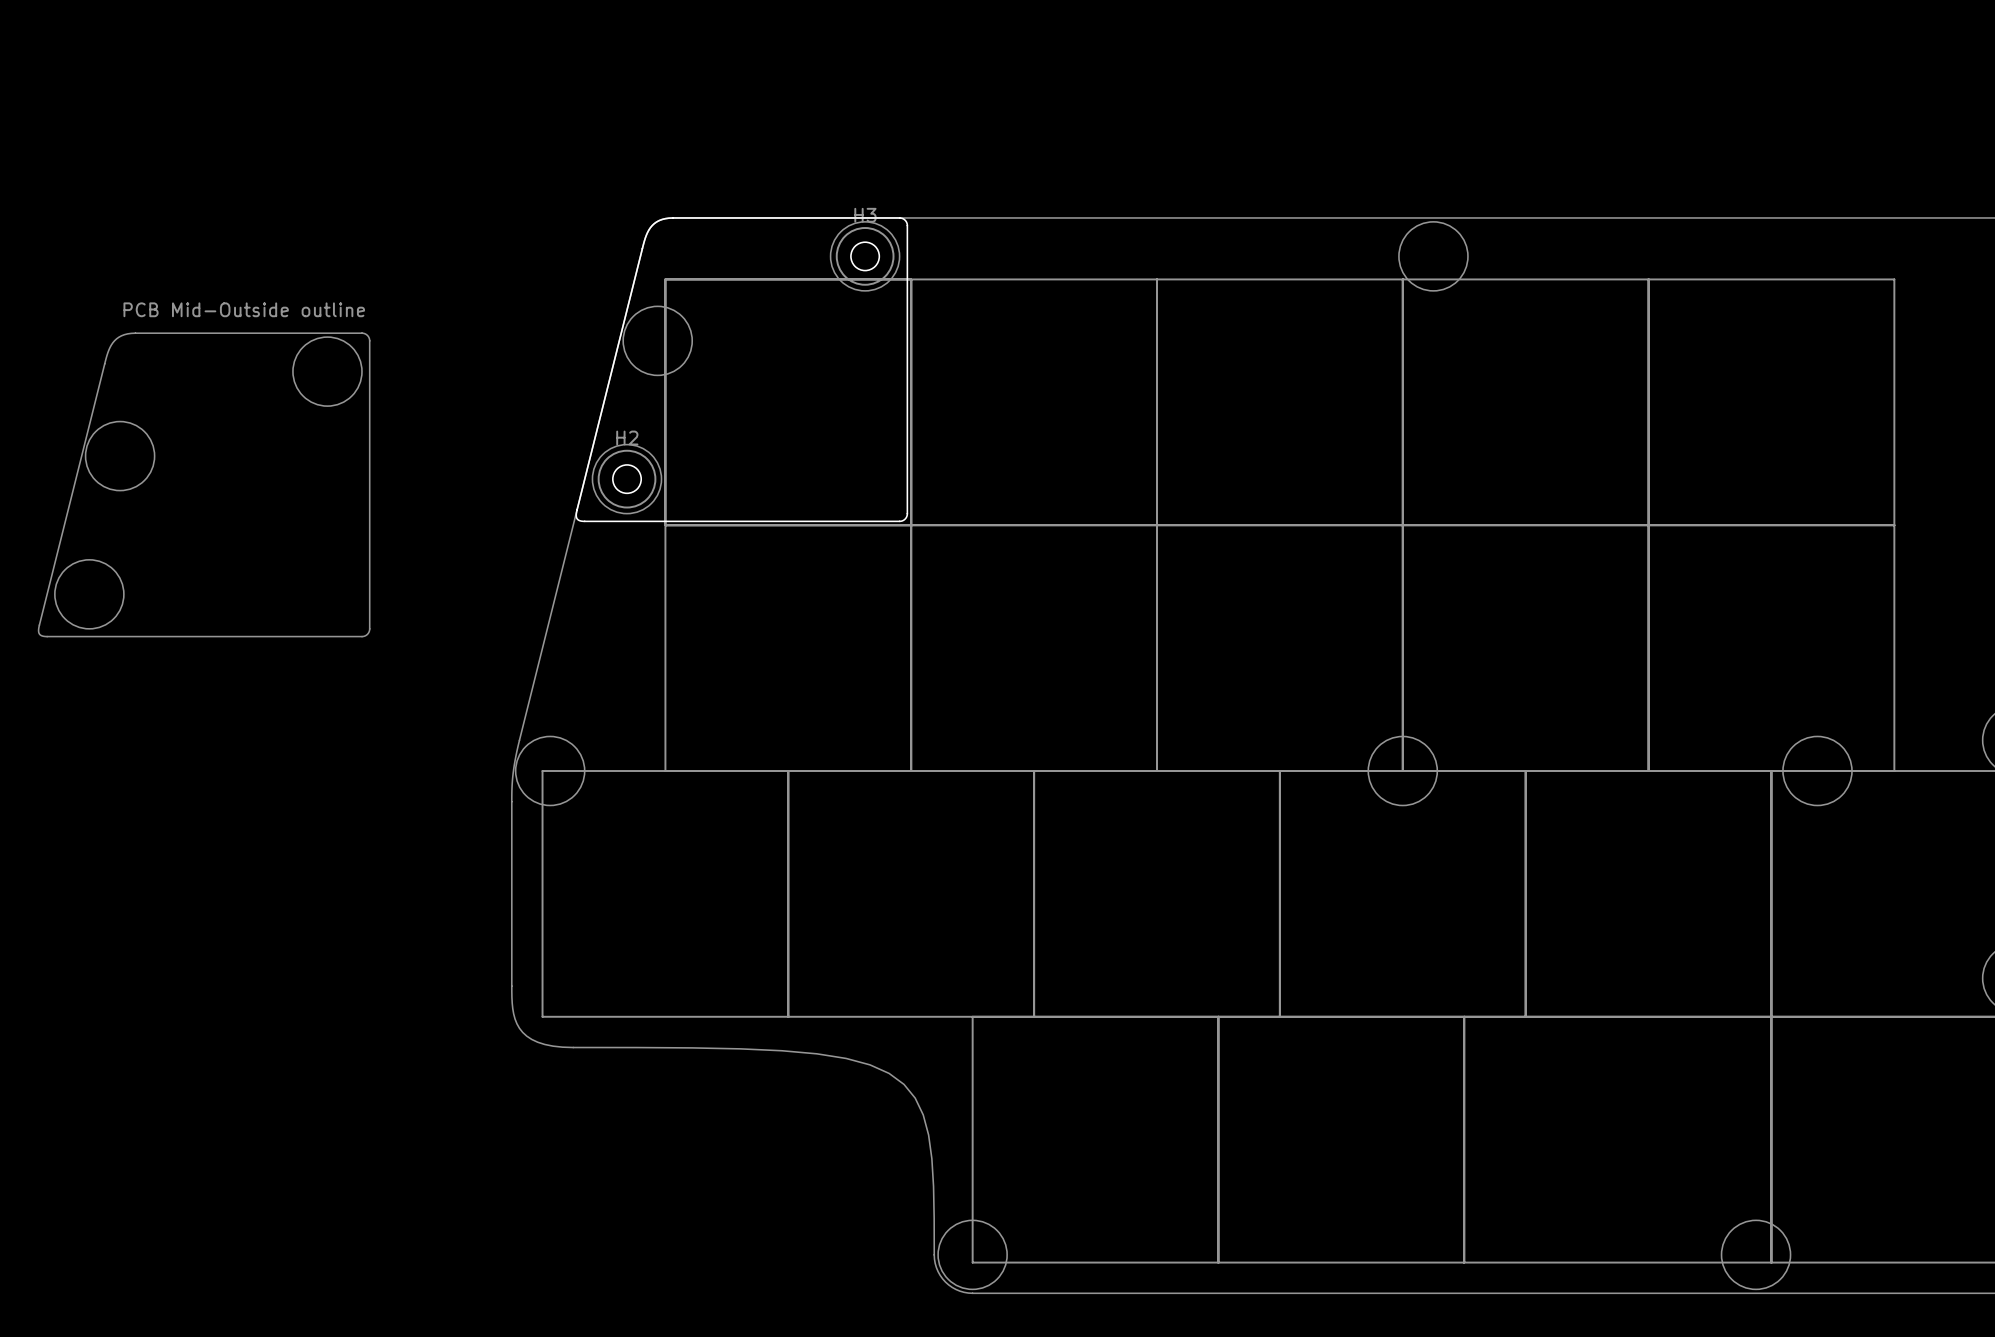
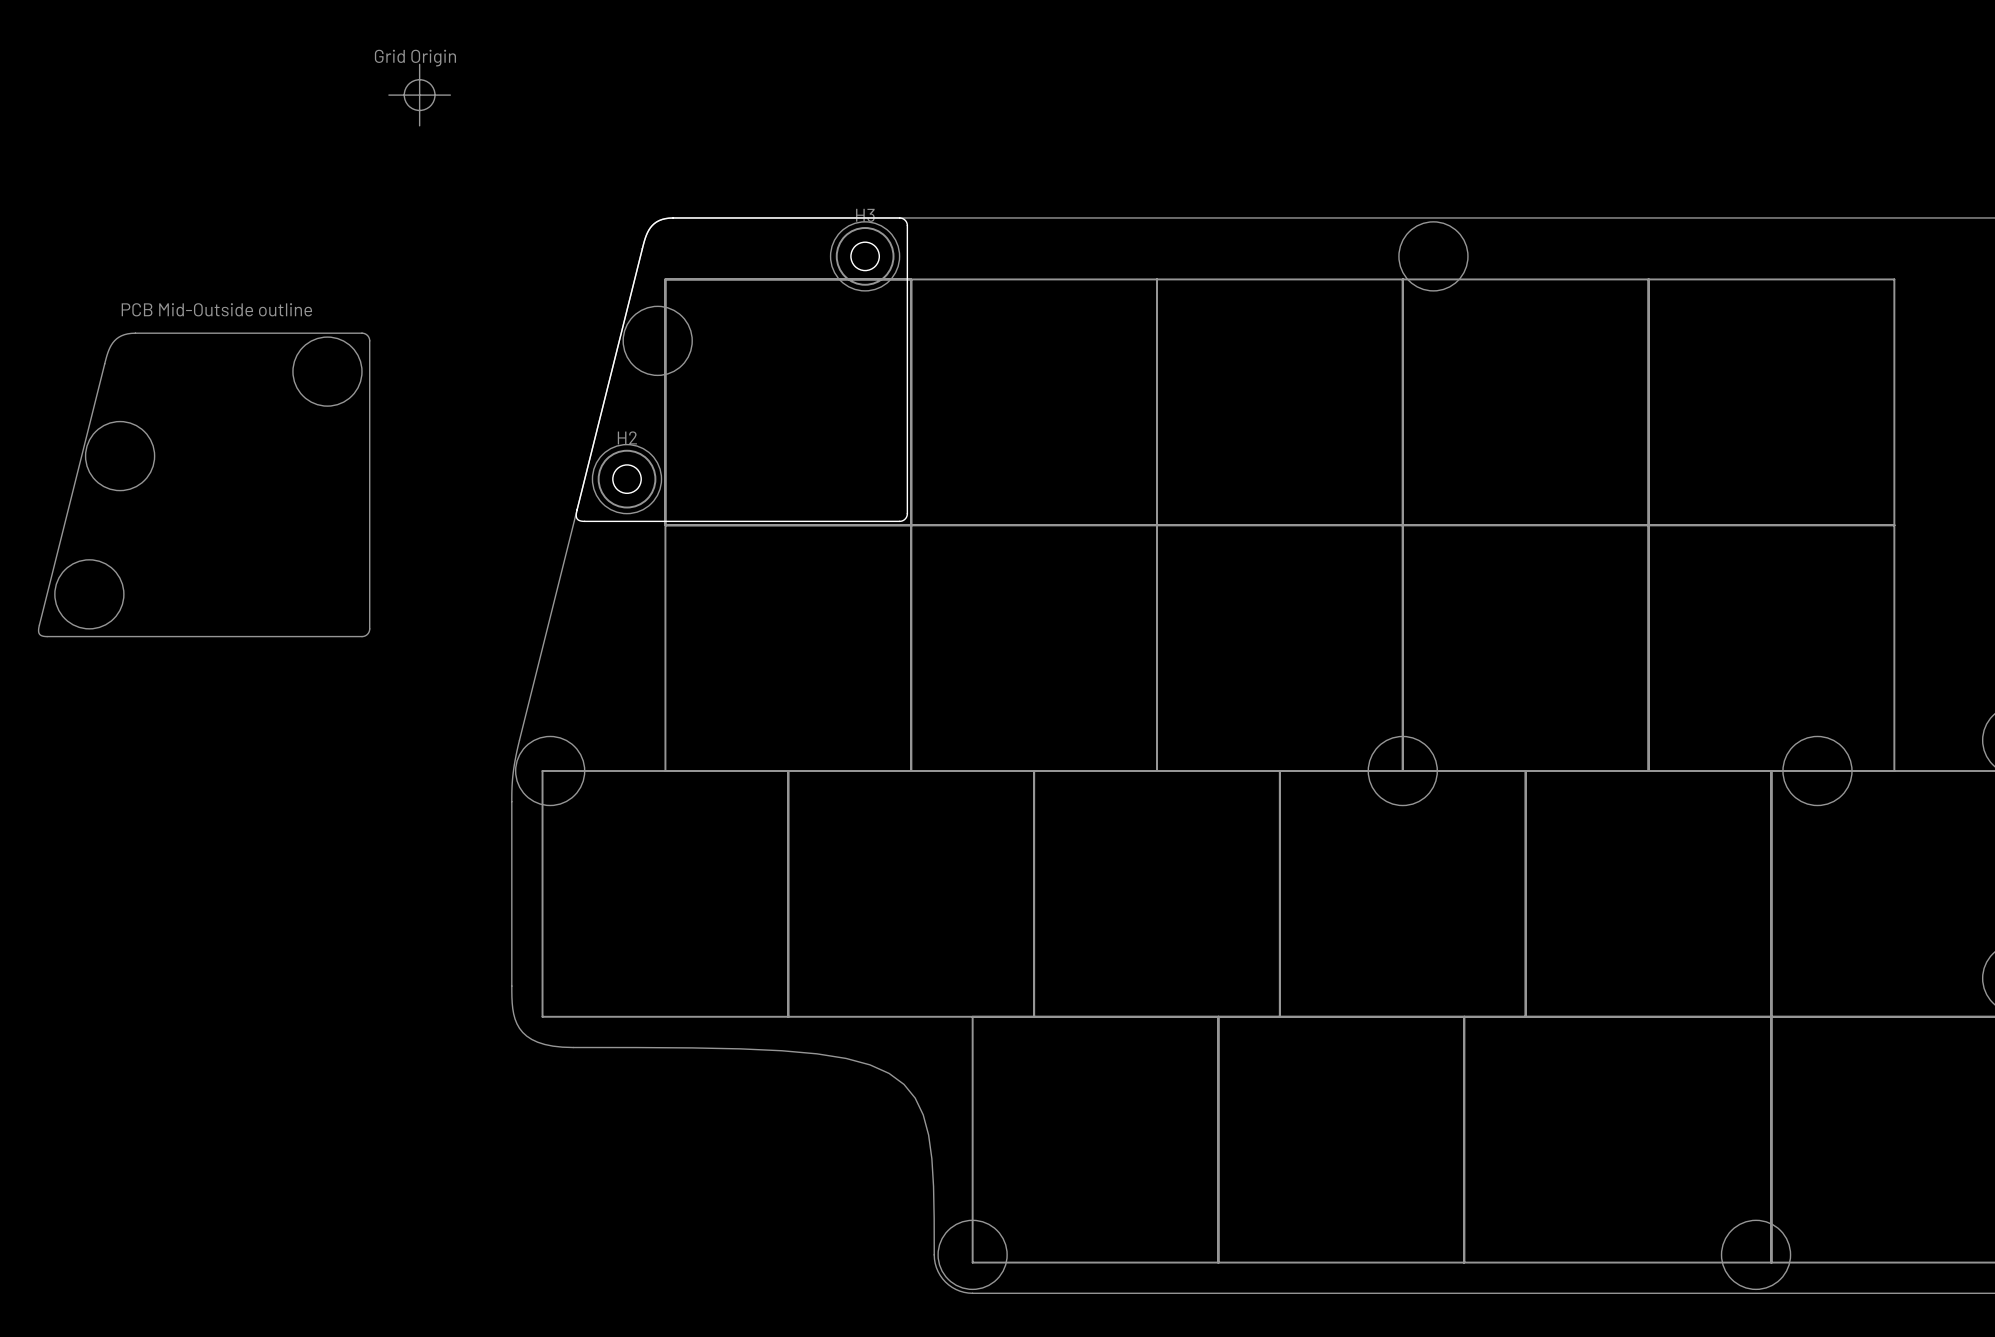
text: none -> Grid Origin (415, 58)
line: none -> (419, 64) (419, 125)
drawing: none -> [403, 79, 436, 112]
line: none -> (388, 95) (450, 95)

